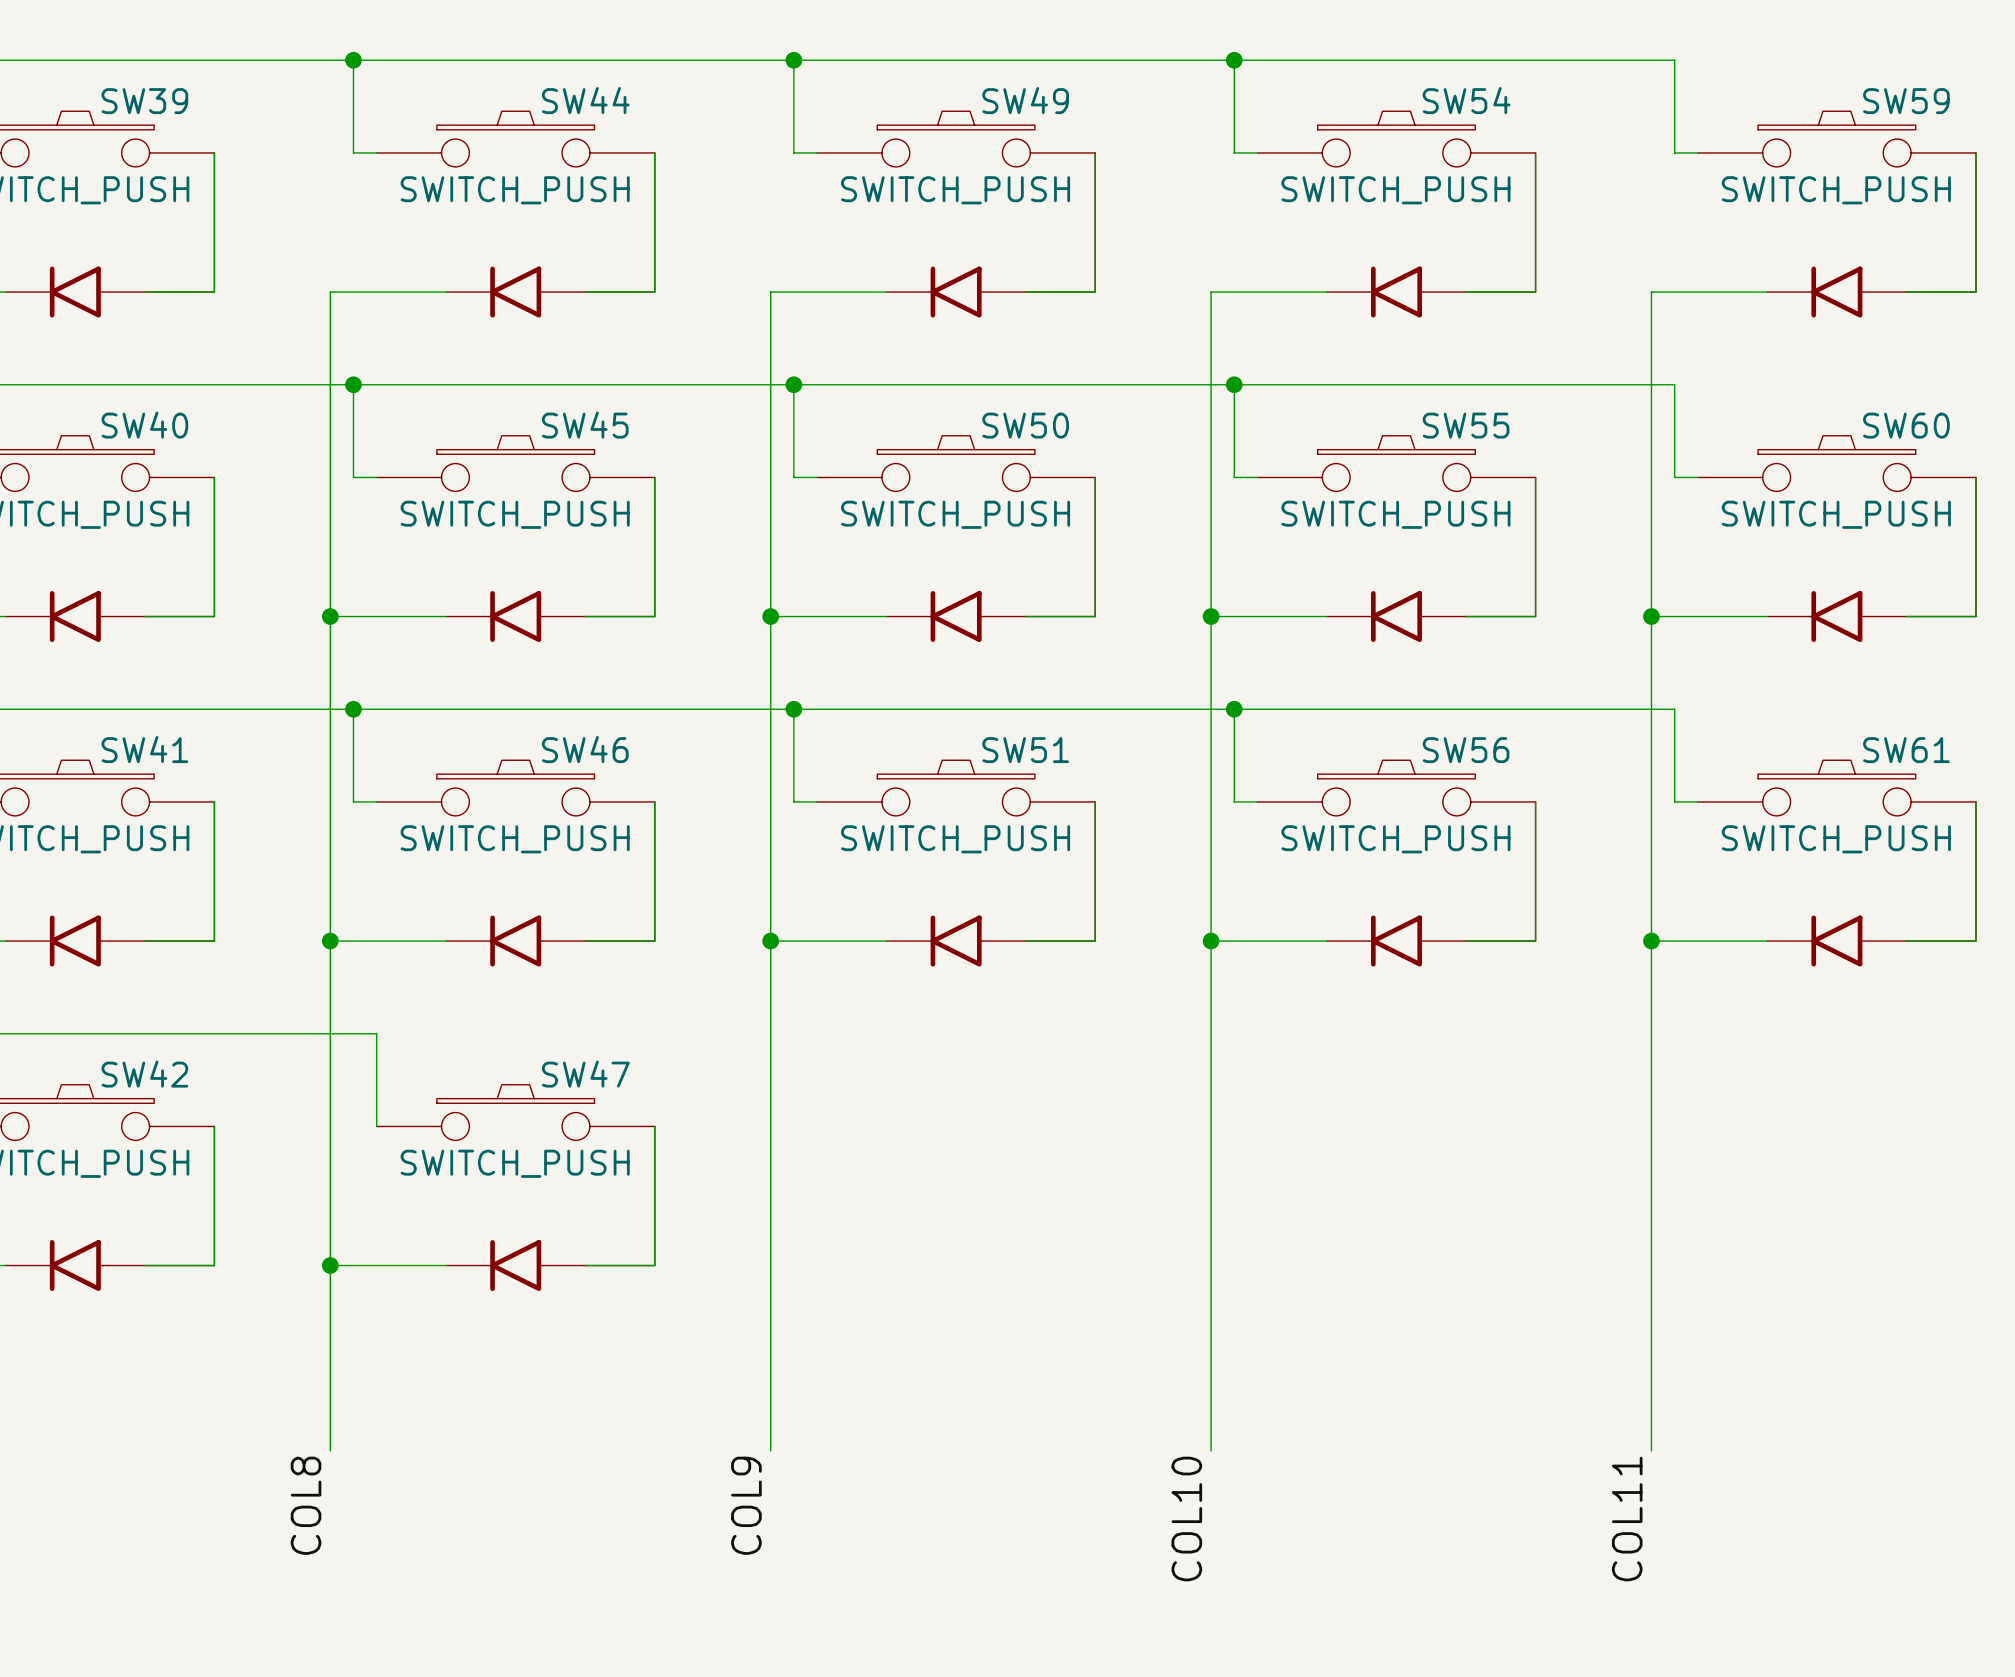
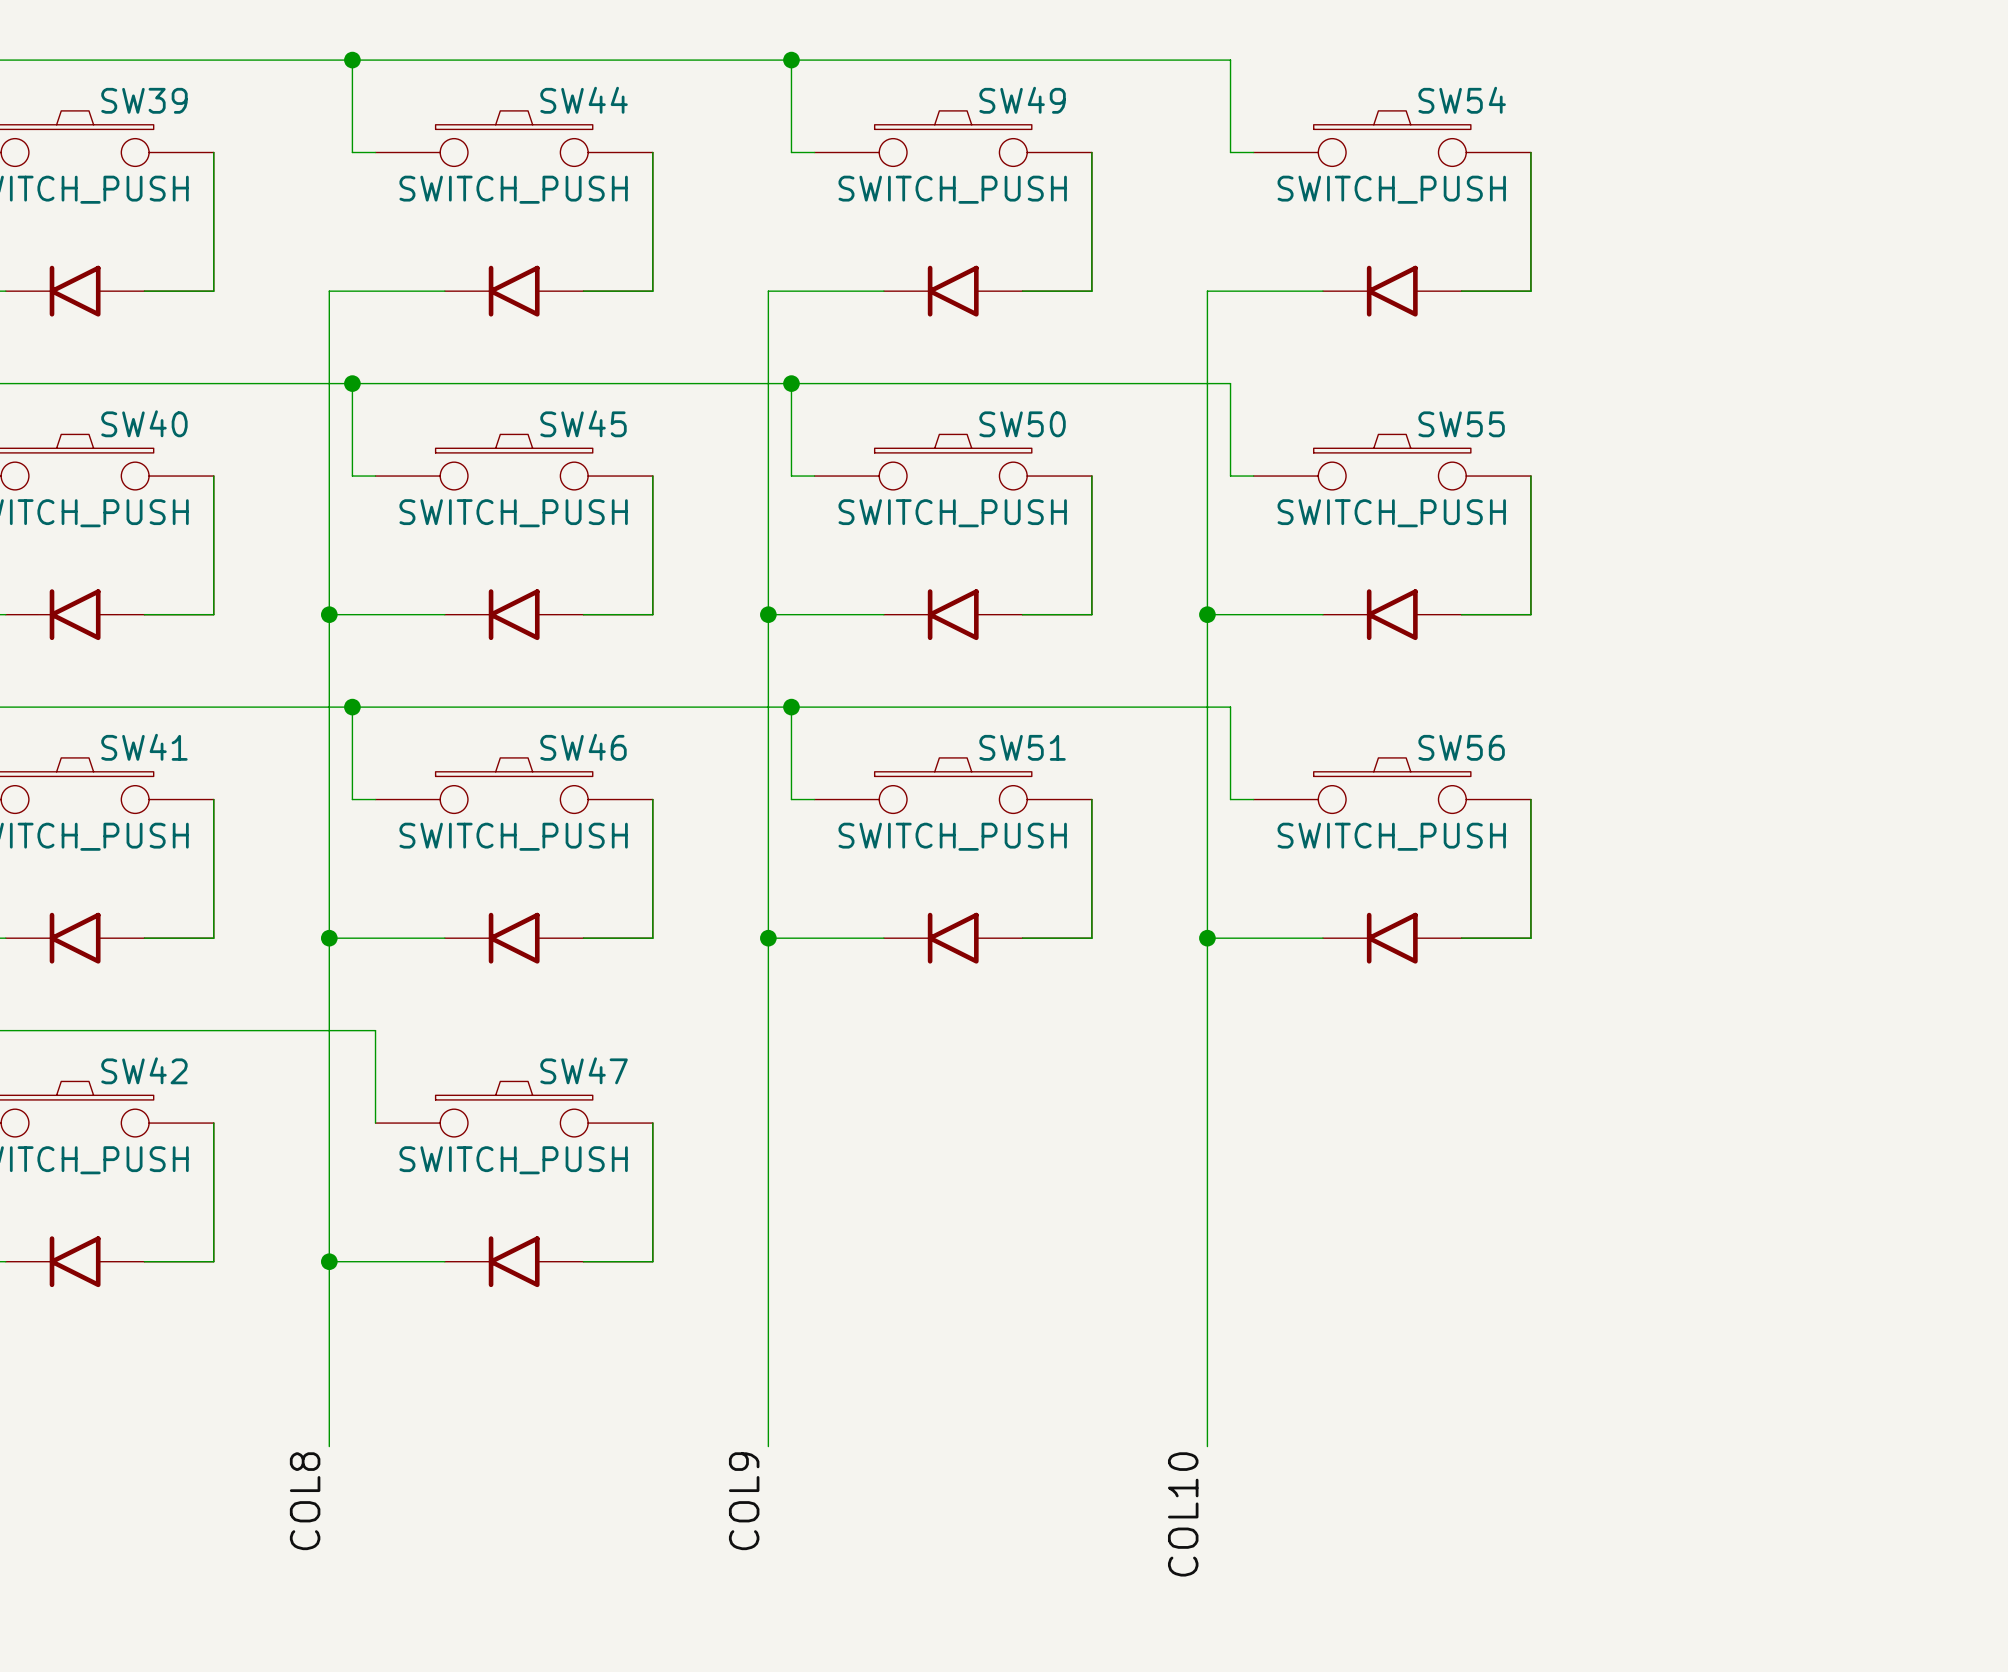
wire: (1234, 60) (1674, 60) (1674, 152) (1697, 152) -> none
junction: (1234, 60) -> none
wire: (1975, 152) (1975, 292) (1906, 292) -> none
SW59: SWITCH_PUSH (1836, 214) -> none
wire: (1767, 292) (1651, 292) (1651, 1450) -> none
wire: (1234, 384) (1674, 384) (1674, 477) (1697, 477) -> none
junction: (1234, 384) -> none
wire: (1975, 477) (1975, 616) (1906, 616) -> none
SW60: SWITCH_PUSH (1836, 538) -> none
wire: (1651, 616) (1767, 616) -> none
junction: (1651, 616) -> none
wire: (1234, 709) (1674, 709) (1674, 801) (1697, 801) -> none
junction: (1234, 709) -> none
wire: (1975, 801) (1975, 941) (1906, 941) -> none
SW61: SWITCH_PUSH (1836, 863) -> none
wire: (1651, 941) (1767, 941) -> none
junction: (1651, 941) -> none
label: COL11 (1627, 1519) -> none

